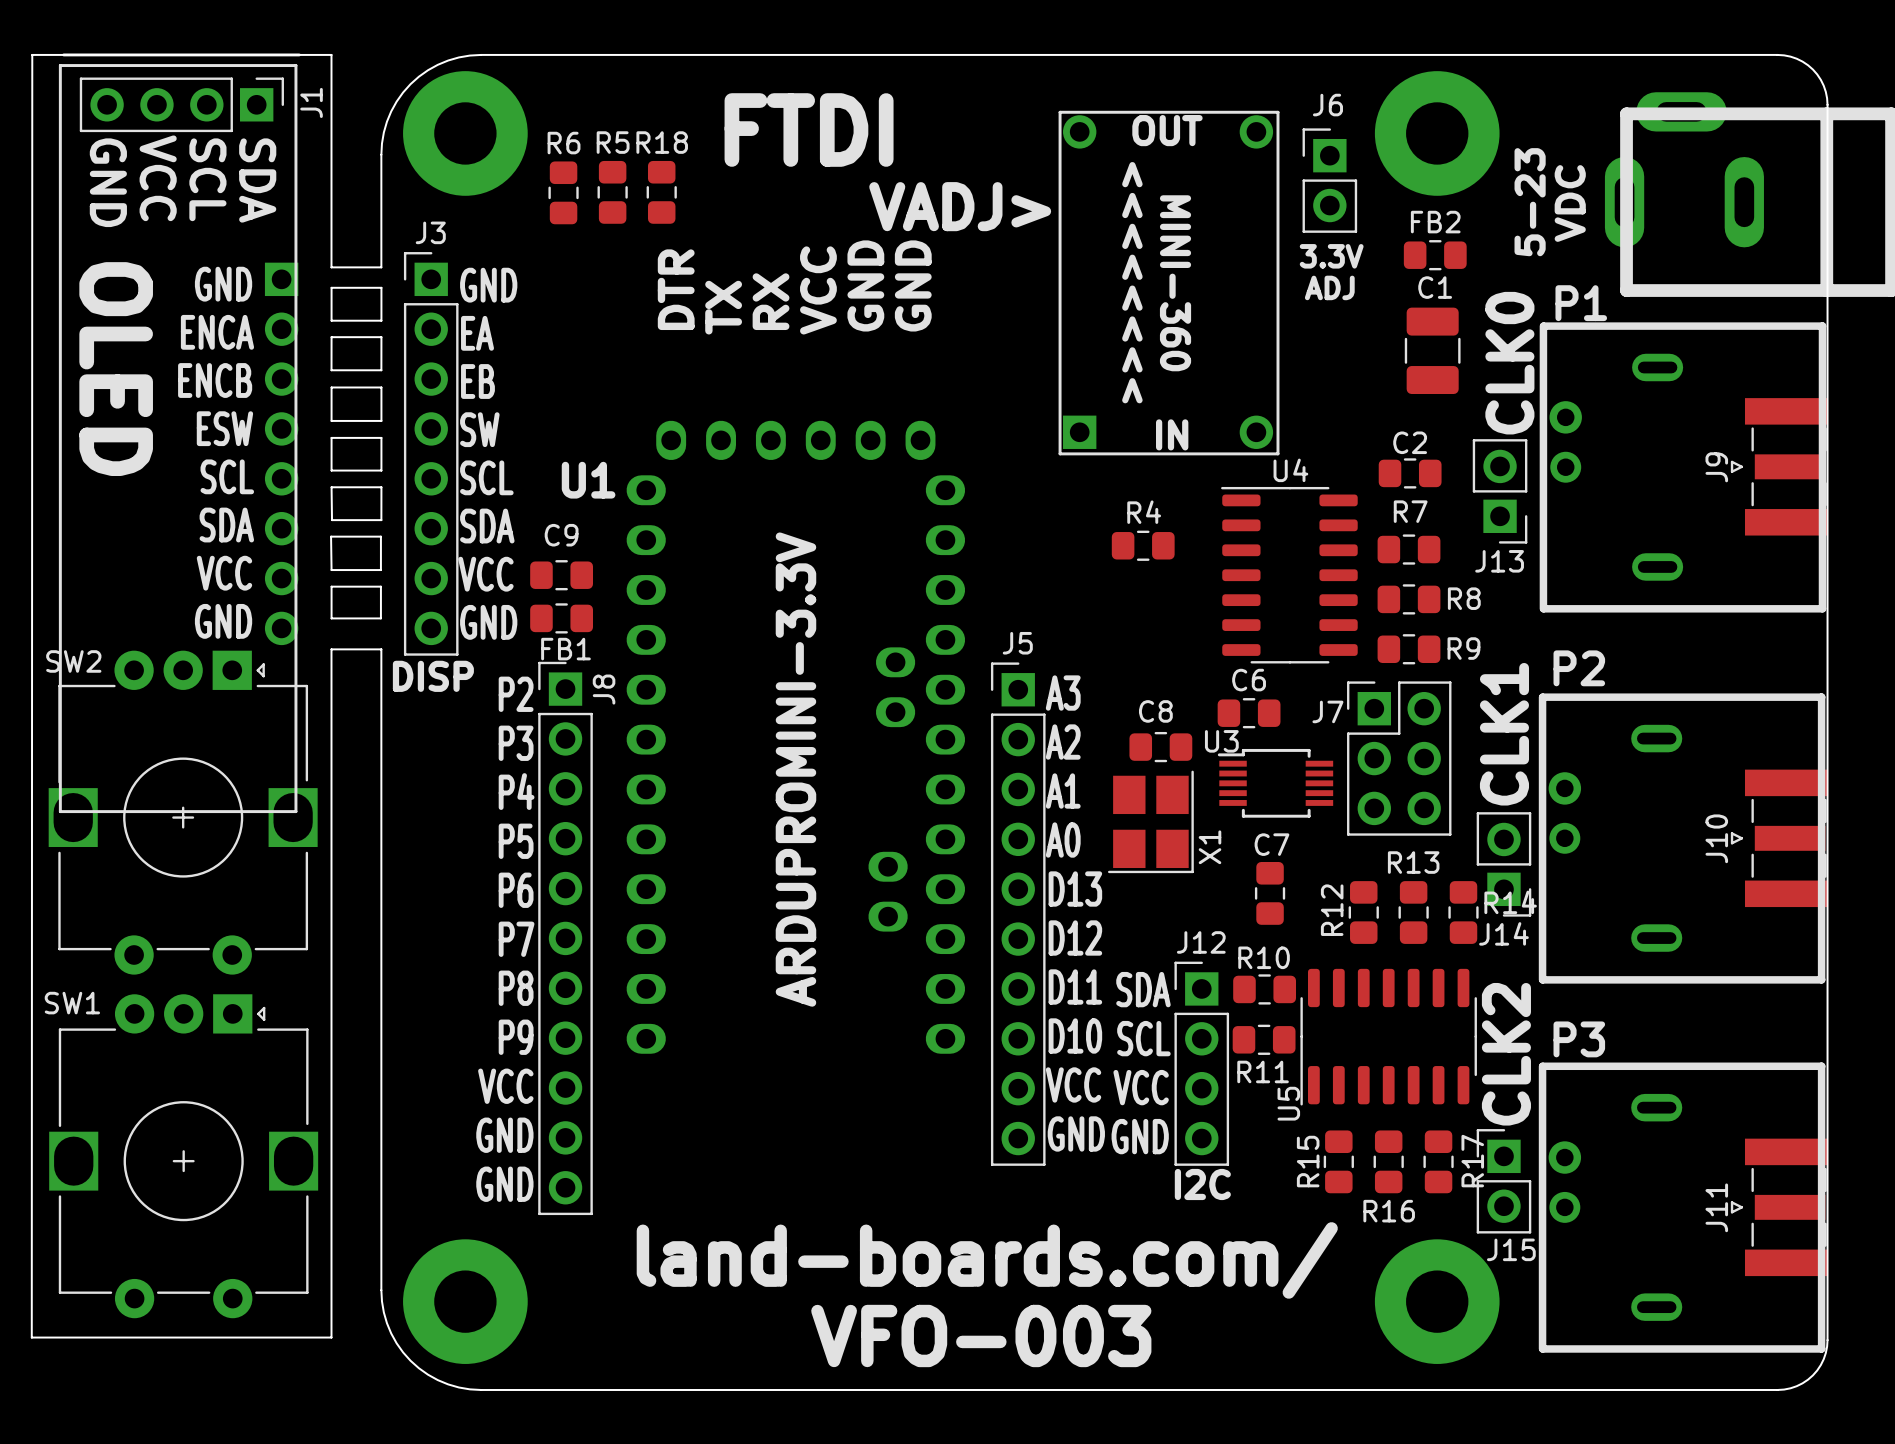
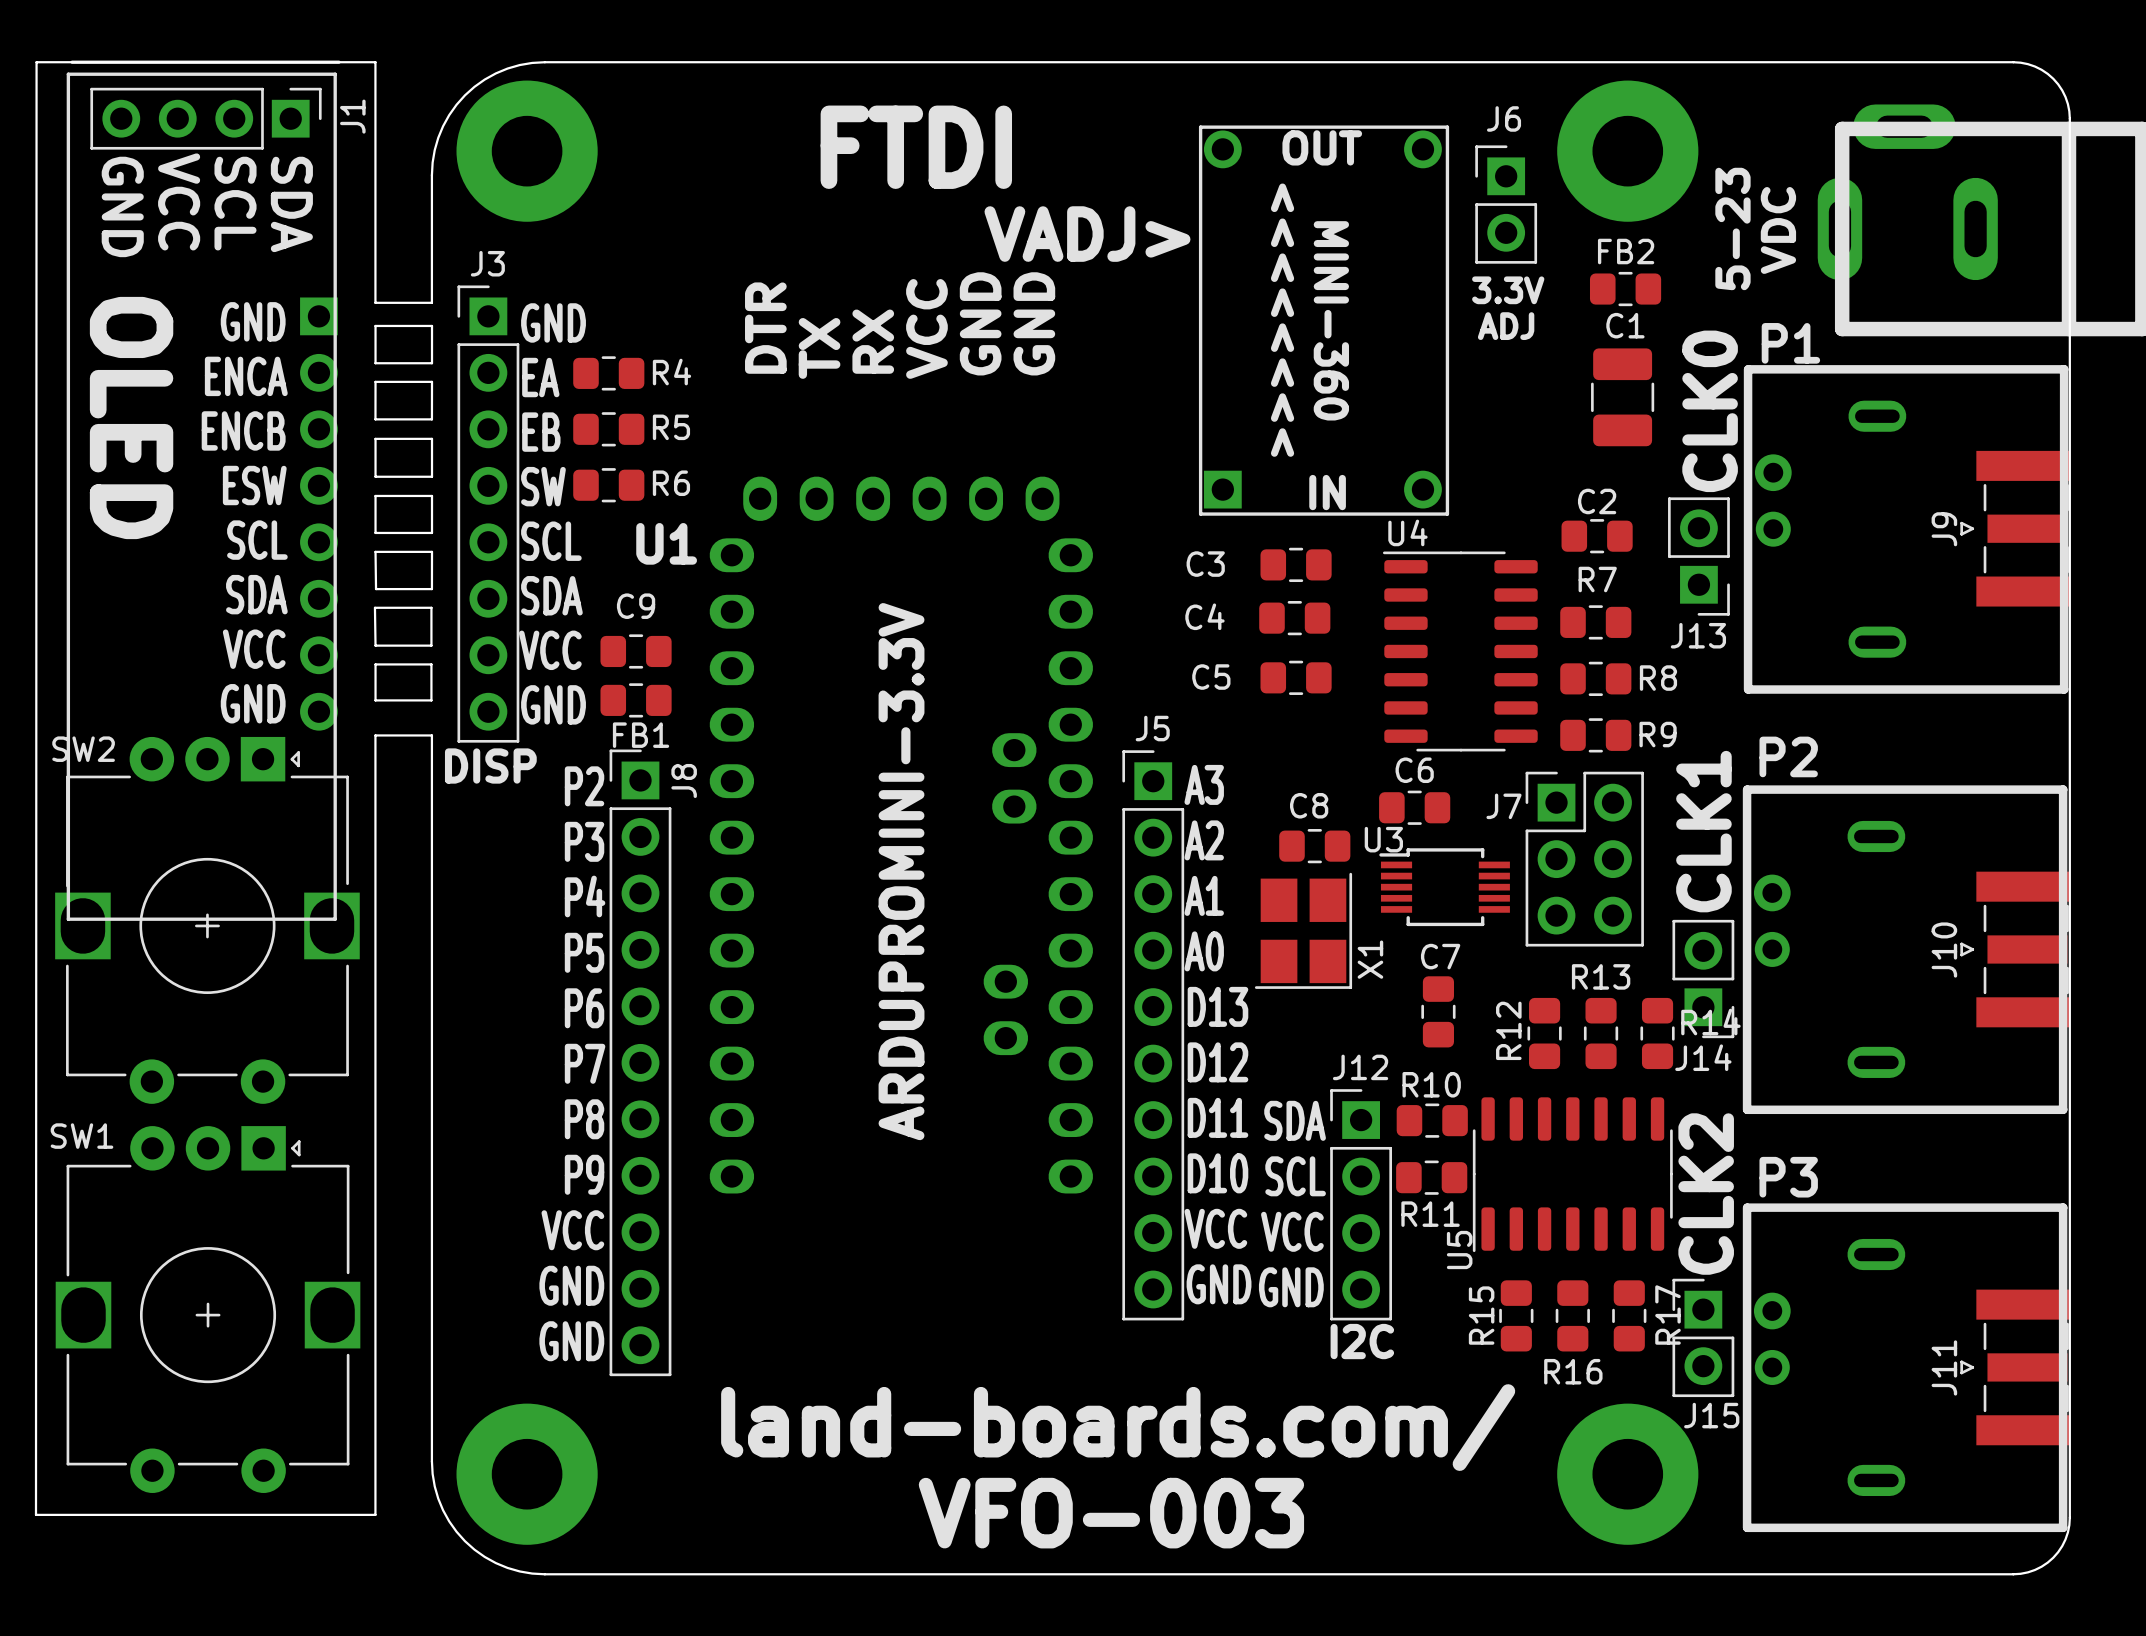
R6 rotation: 0° (563, 192) -> 90° clockwise (608, 485)
R6 position: (563, 192) -> (608, 485)
R5 rotation: 0° (612, 192) -> 90° clockwise (608, 429)
R5 position: (612, 192) -> (608, 429)
R18: (661, 192) -> none
R4: none -> (608, 373)
U4 name position: U4 (1290, 470) -> U4 (1407, 532)
C3: none -> (1296, 564)
R4 name: R4 (1144, 512) -> C4 (1204, 616)
C5: none -> (1296, 677)

